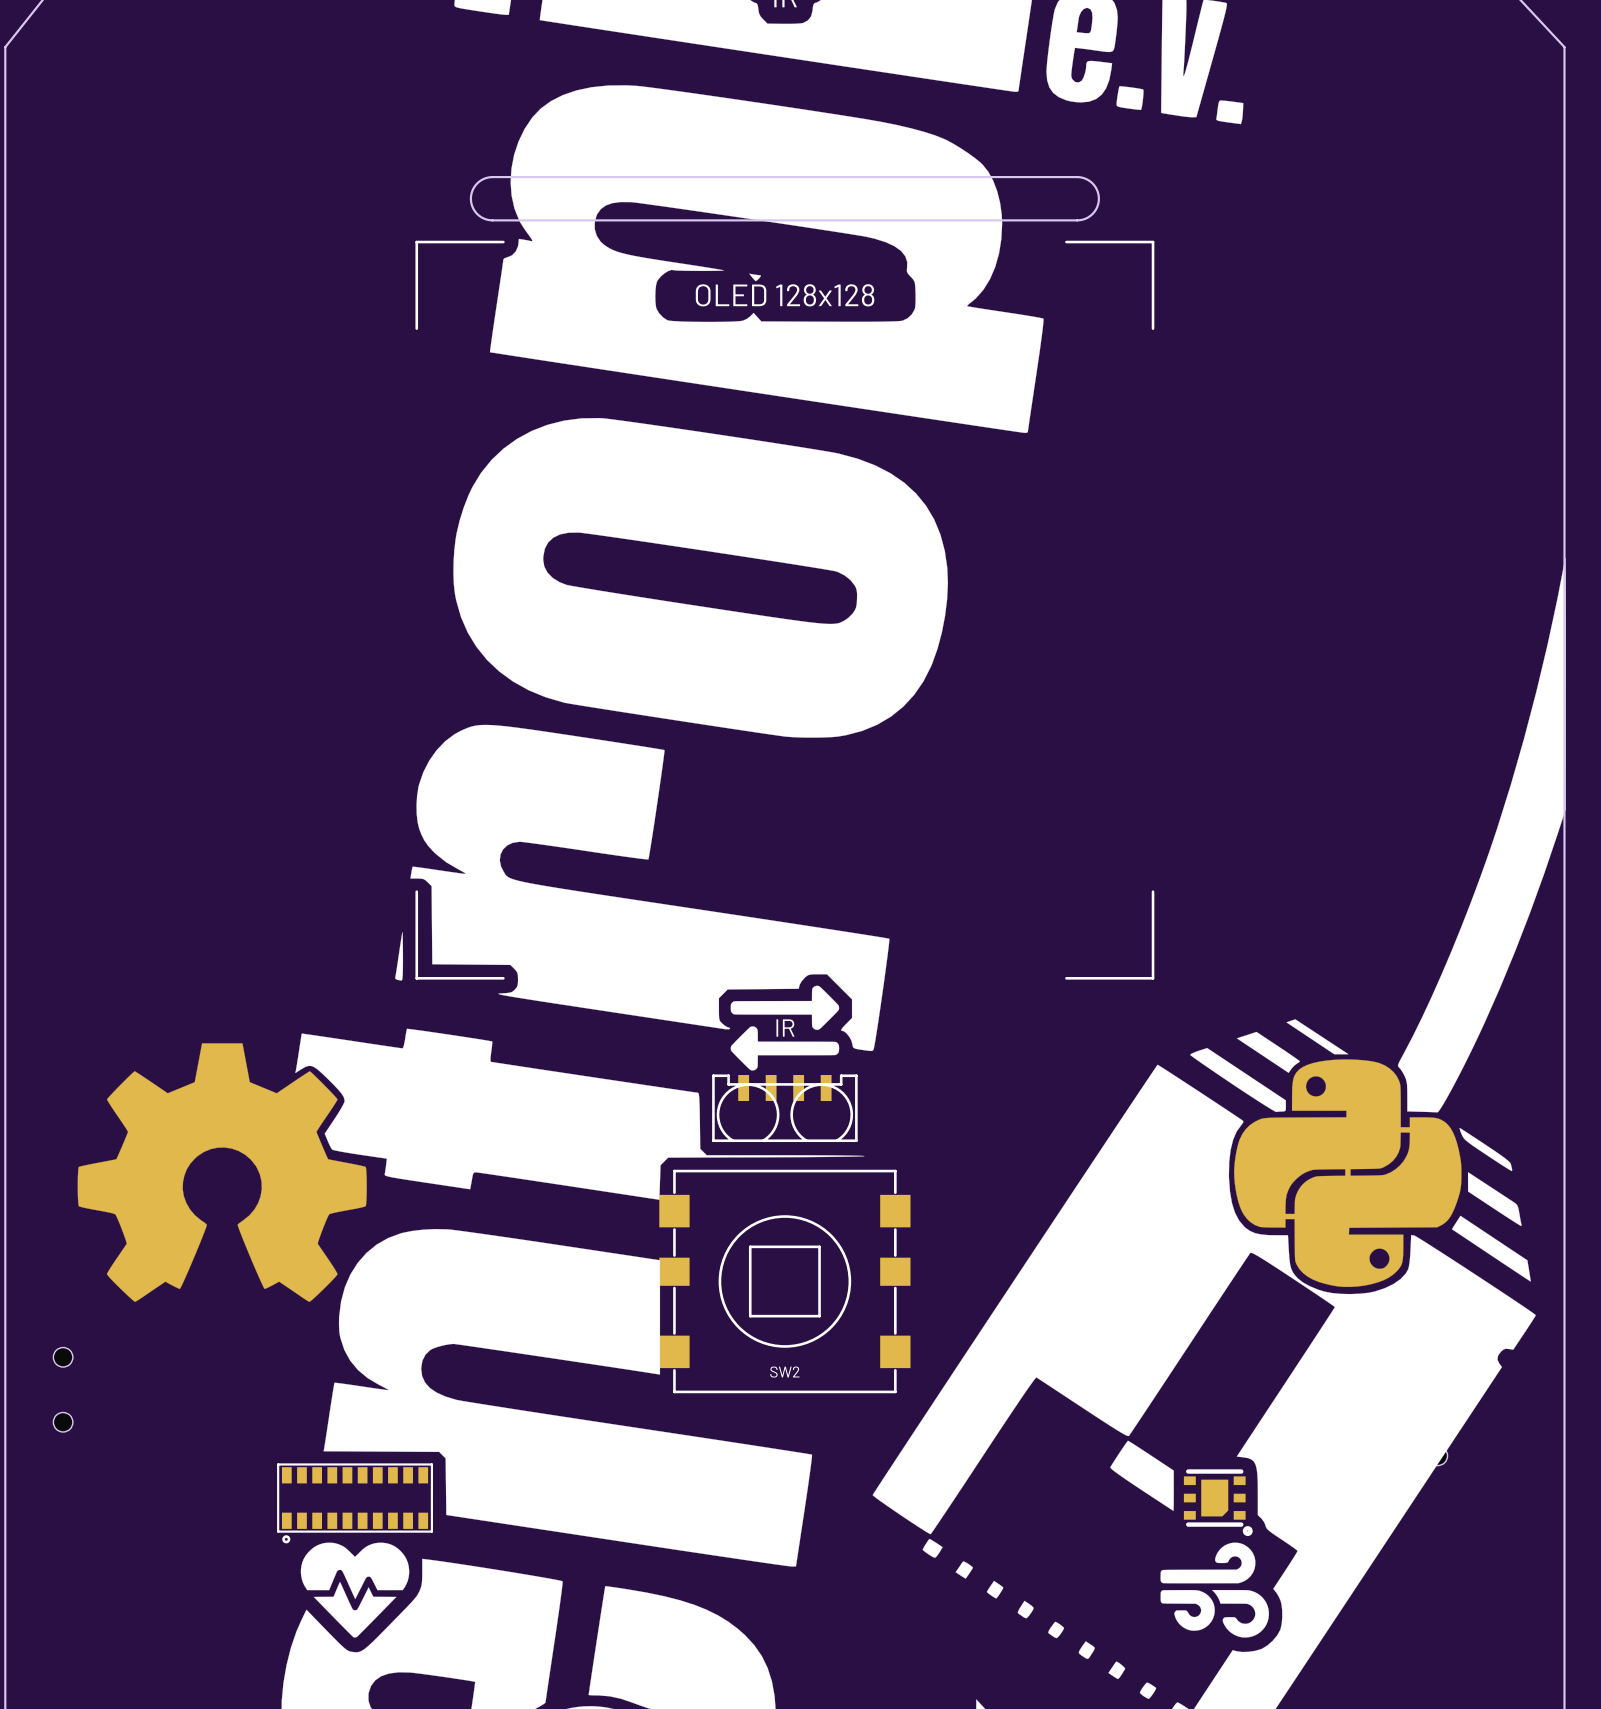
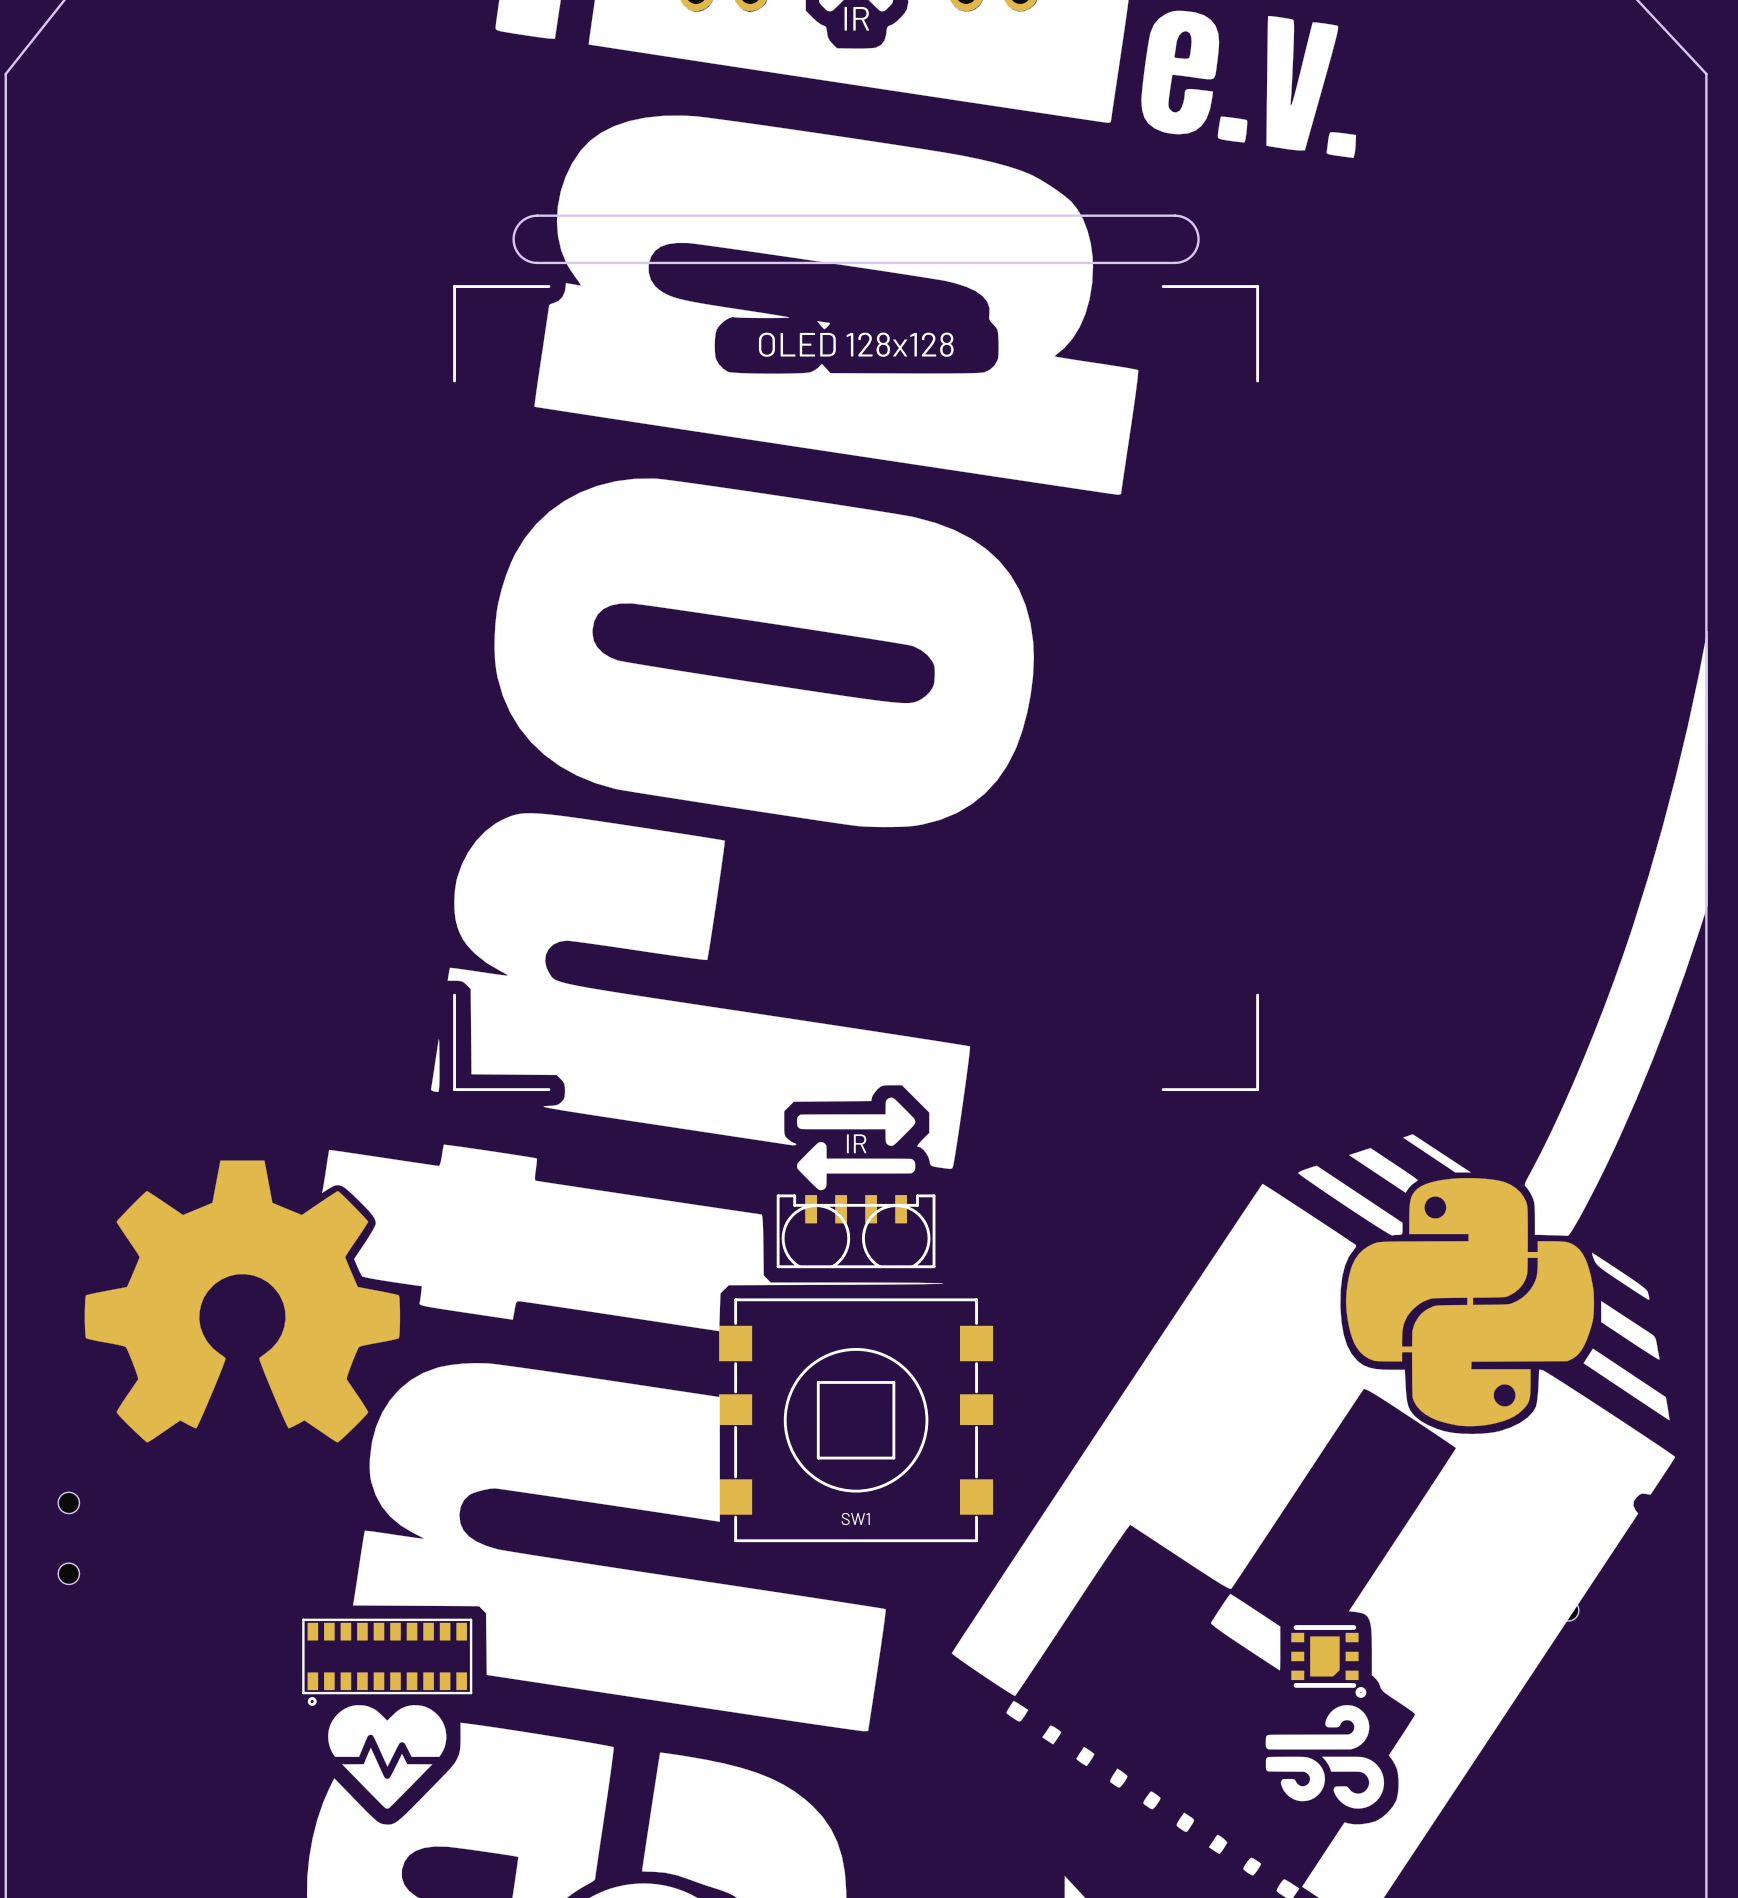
SW2 name: SW2 (784, 1372) -> SW1 (855, 1519)

